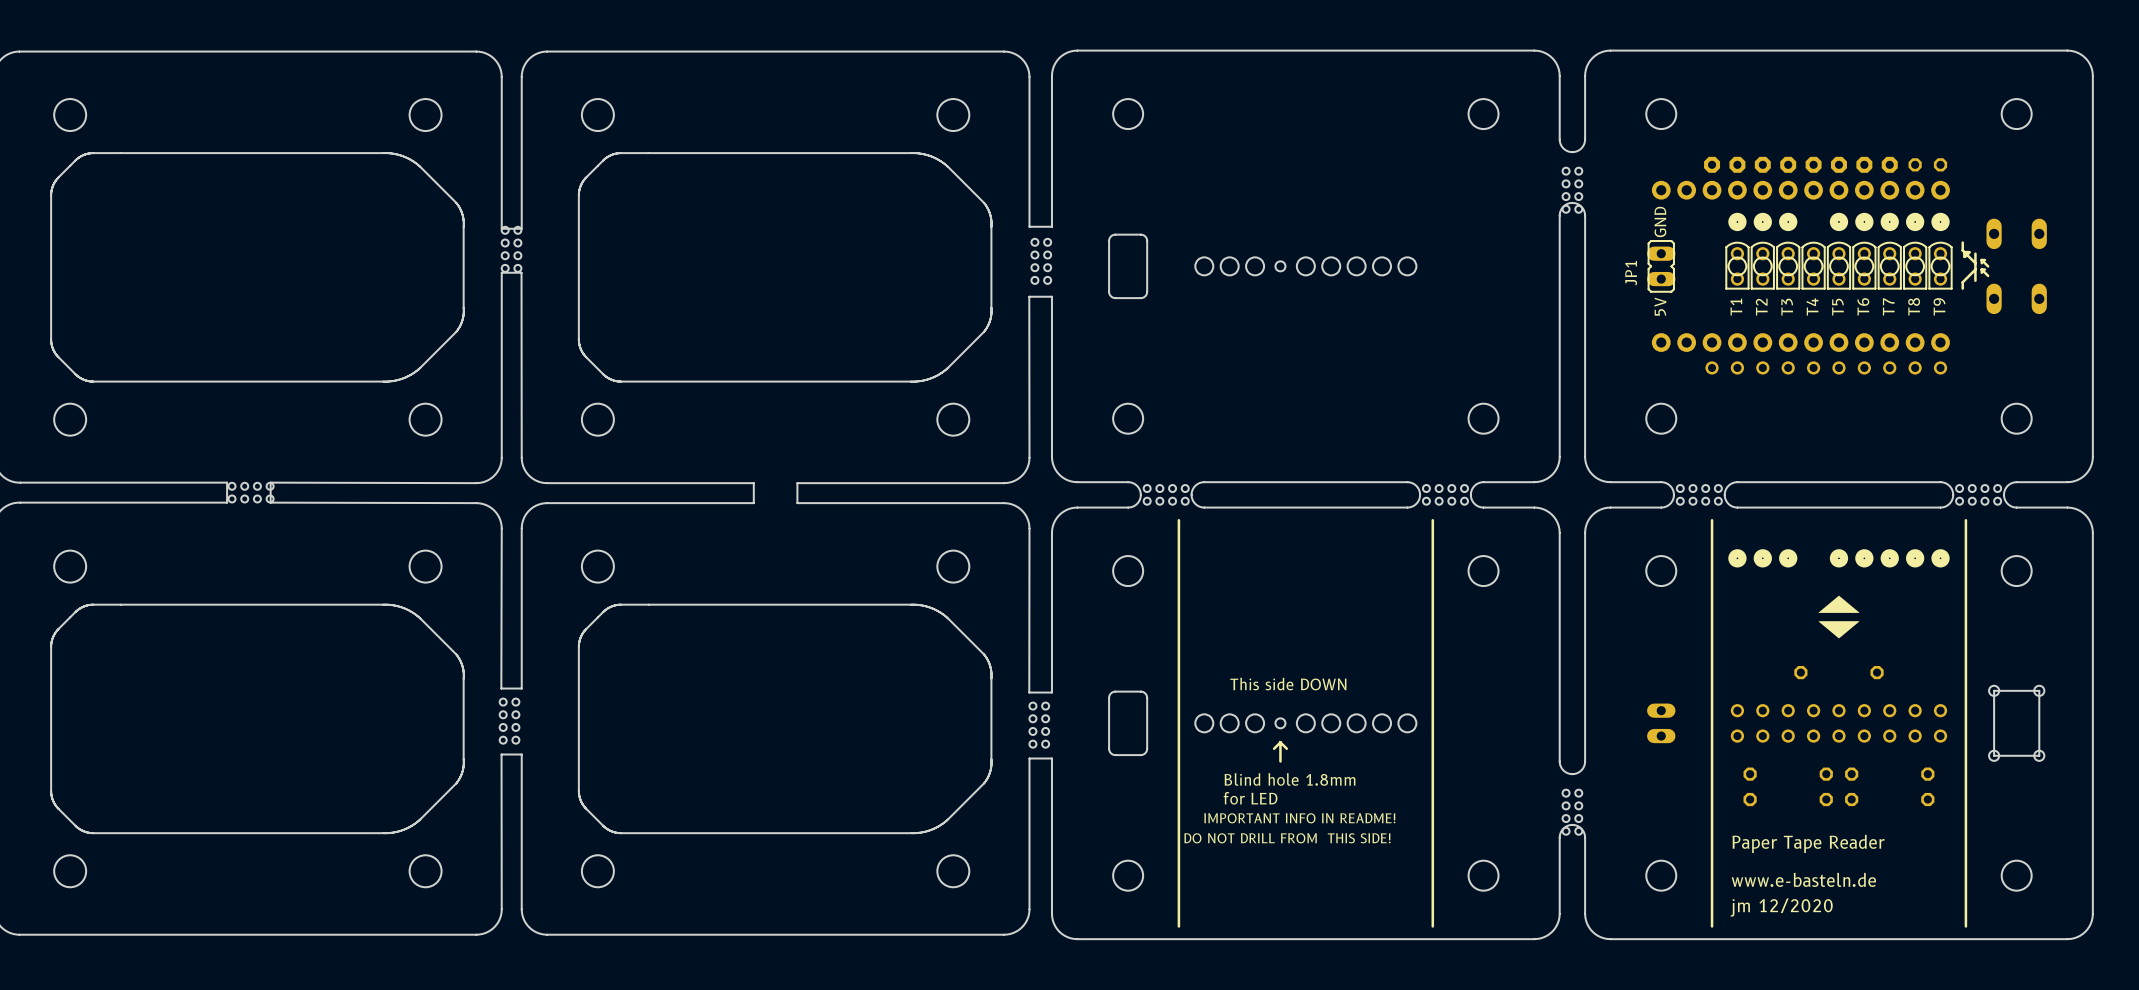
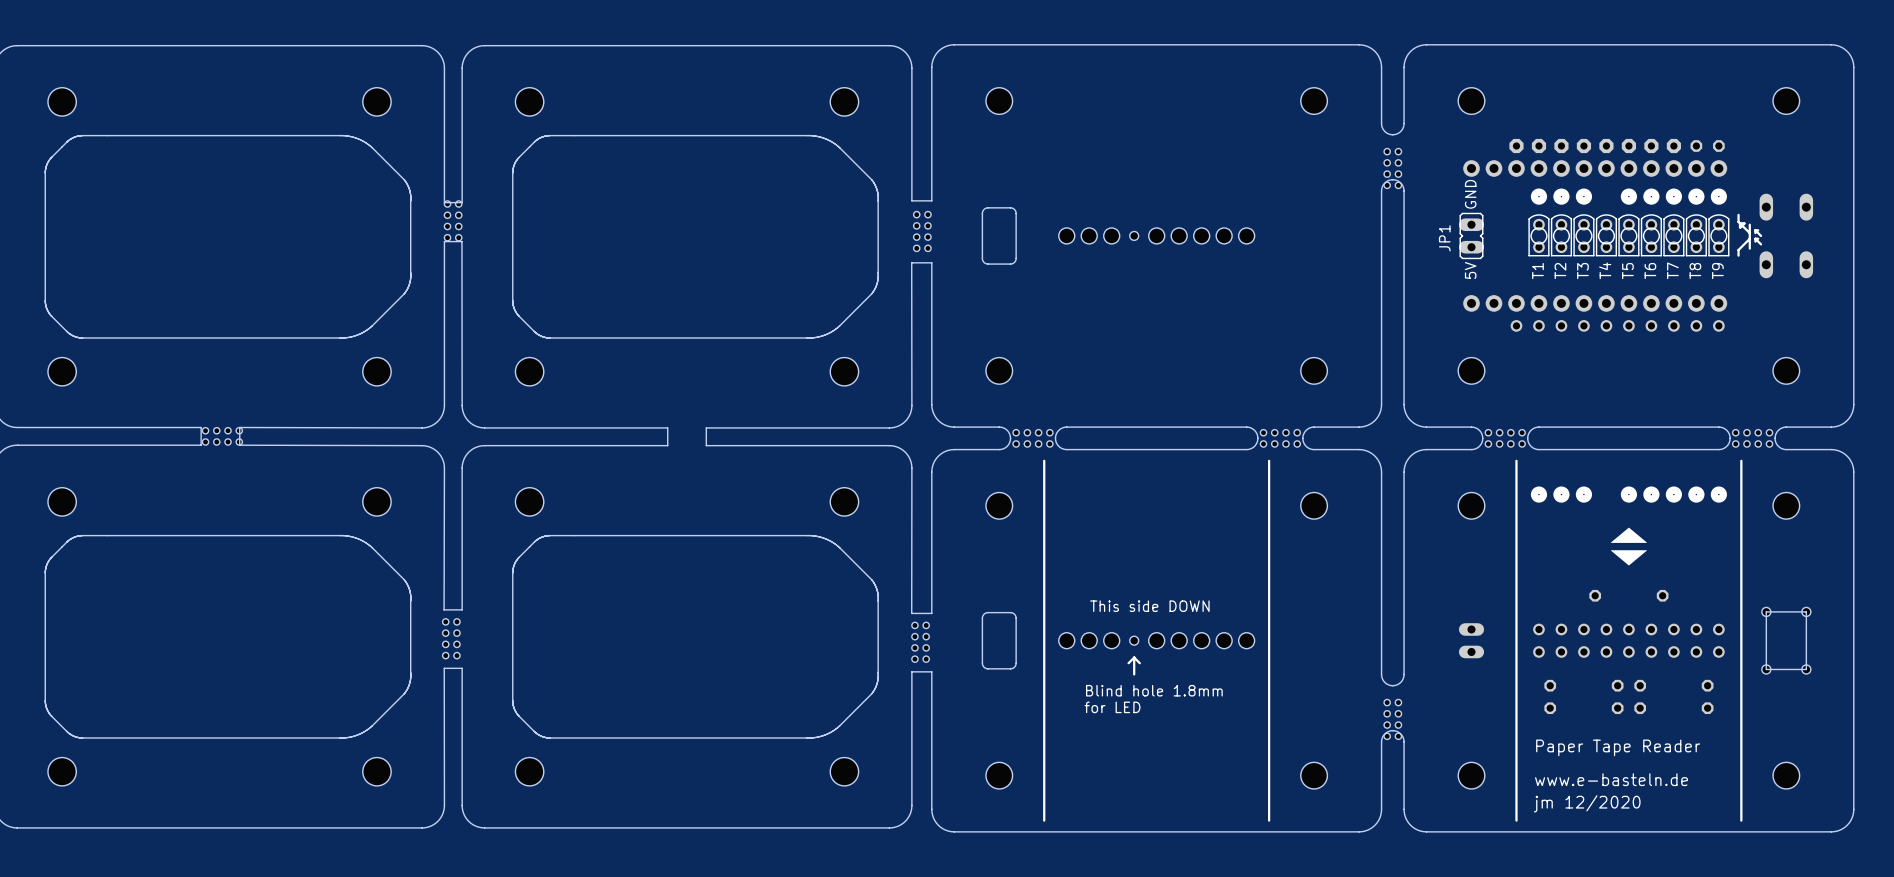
text: IMPORTANT INFO IN README! (1299, 818) -> none
text: DO NOT DRILL FROM THIS SIDE! (1287, 838) -> none

